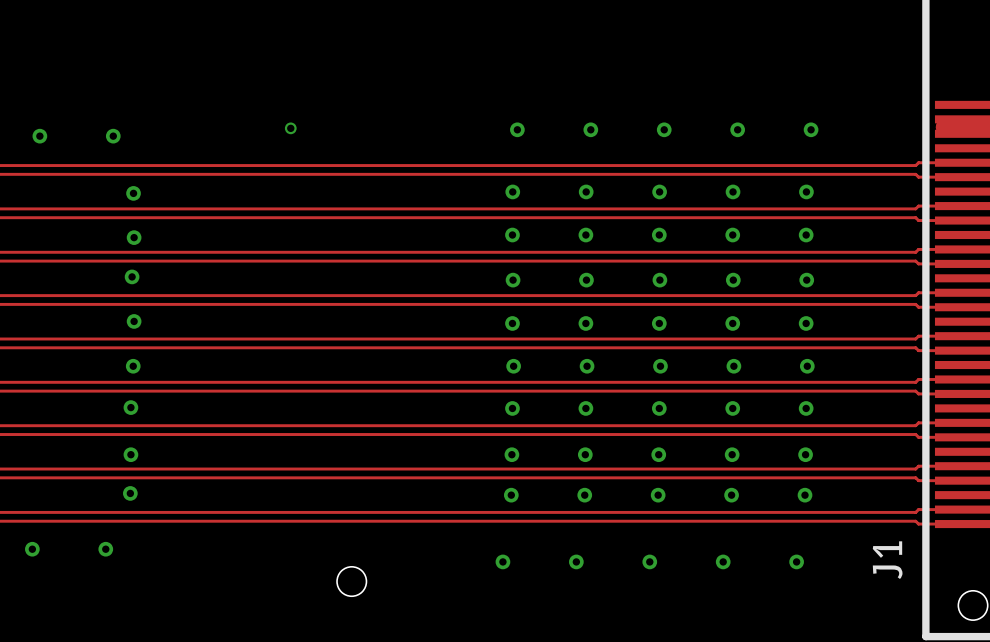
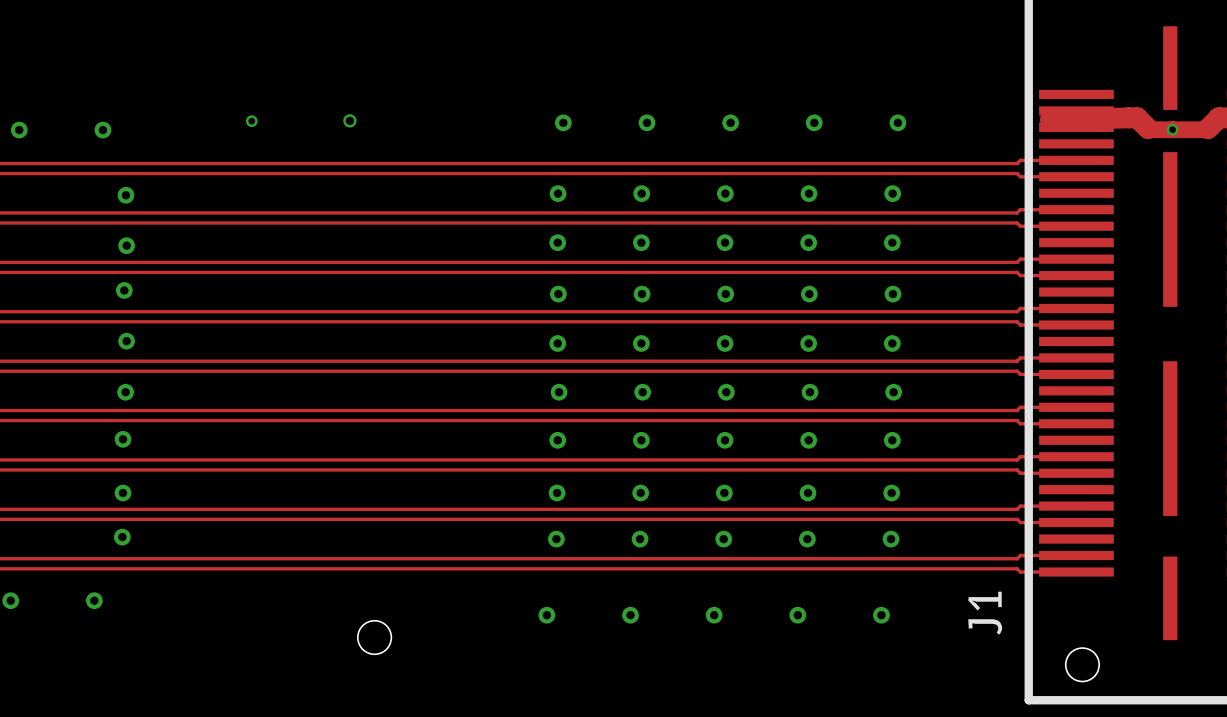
via: none -> (251, 121)
via position: (290, 128) -> (349, 120)

